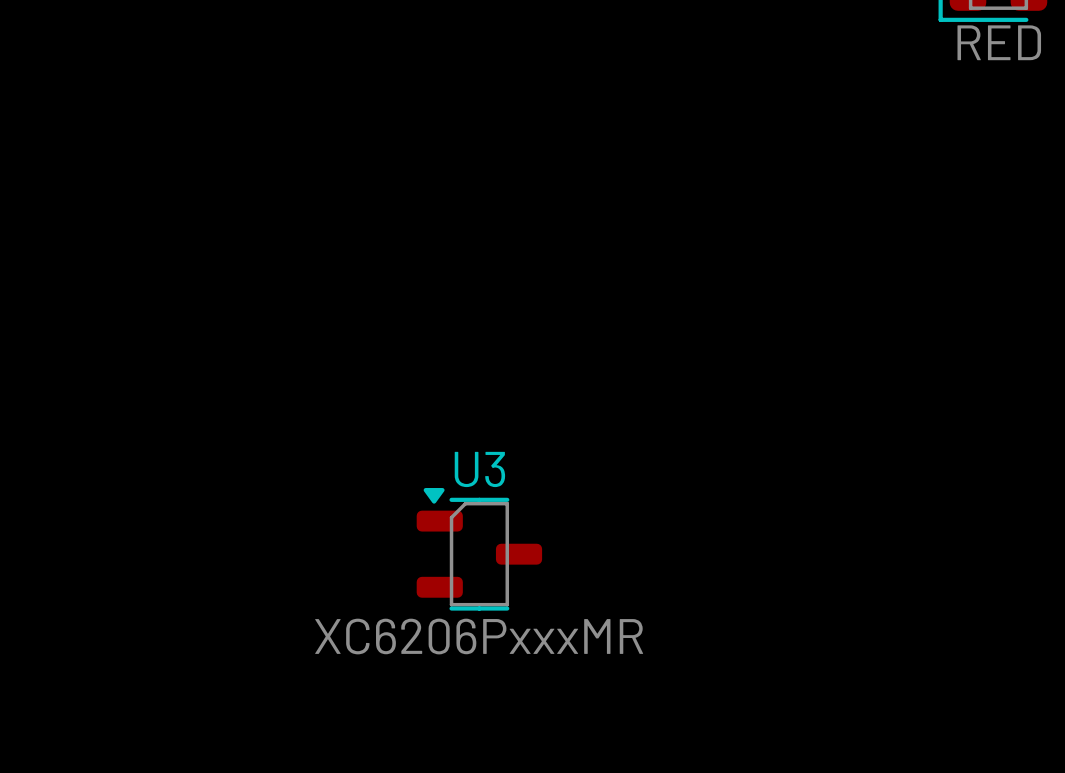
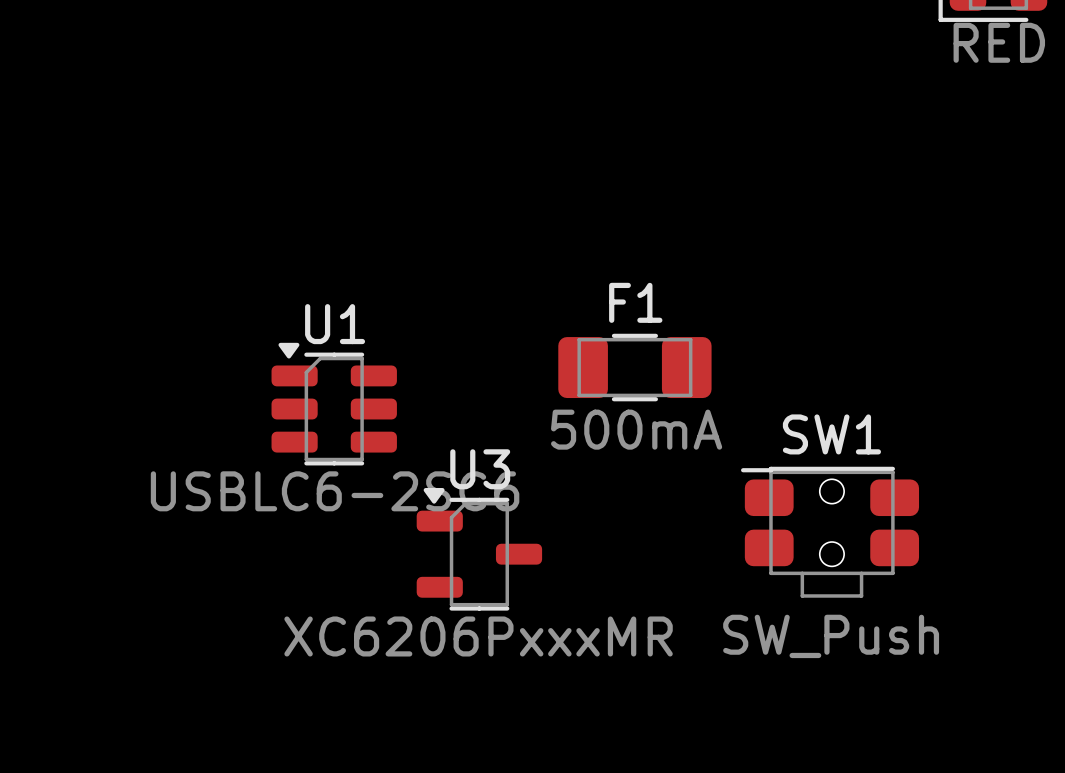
F1: none -> 500mA (634, 367)
U1: none -> USBLC6-2SC6 (334, 404)
SW1: none -> SW_Push (830, 532)

